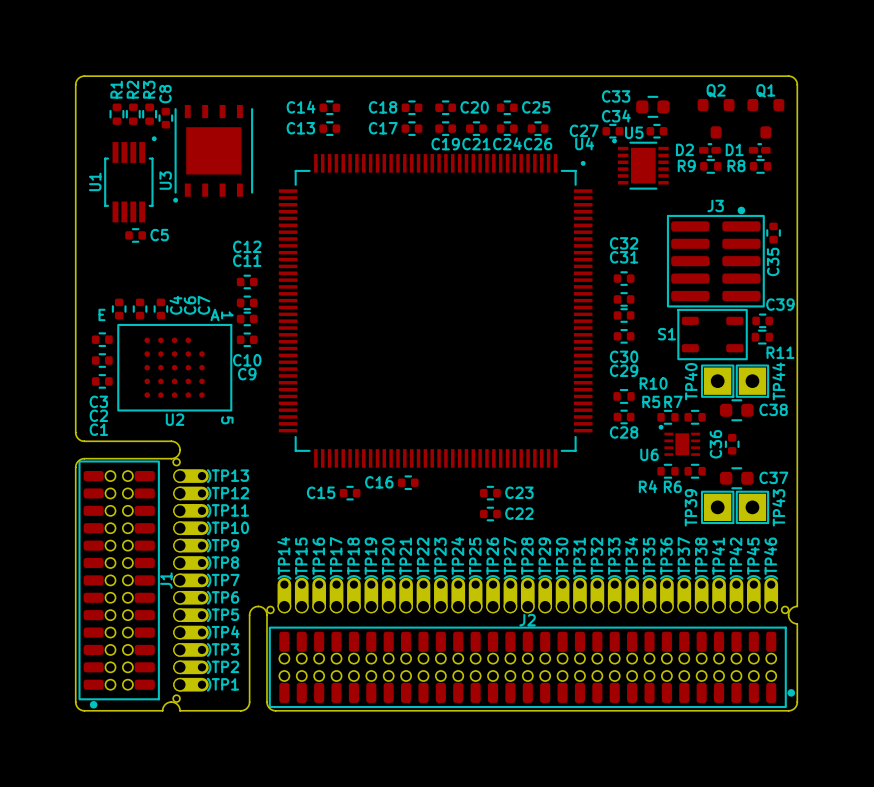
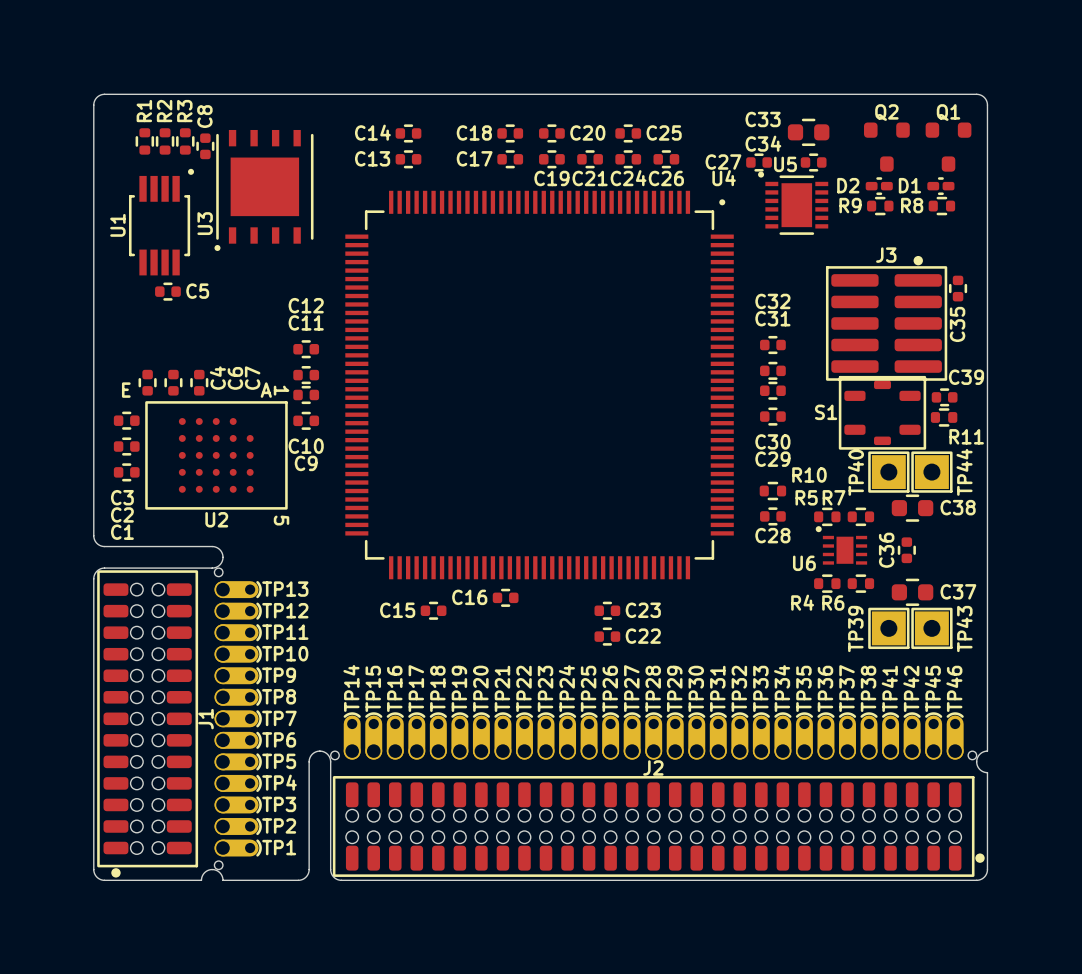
S1 footprint: [677, 308, 748, 361] -> [838, 375, 927, 450]

